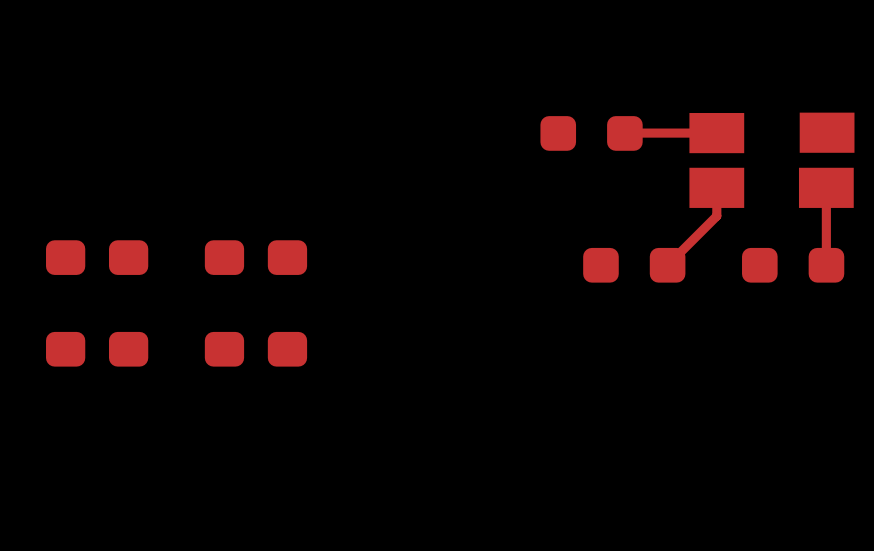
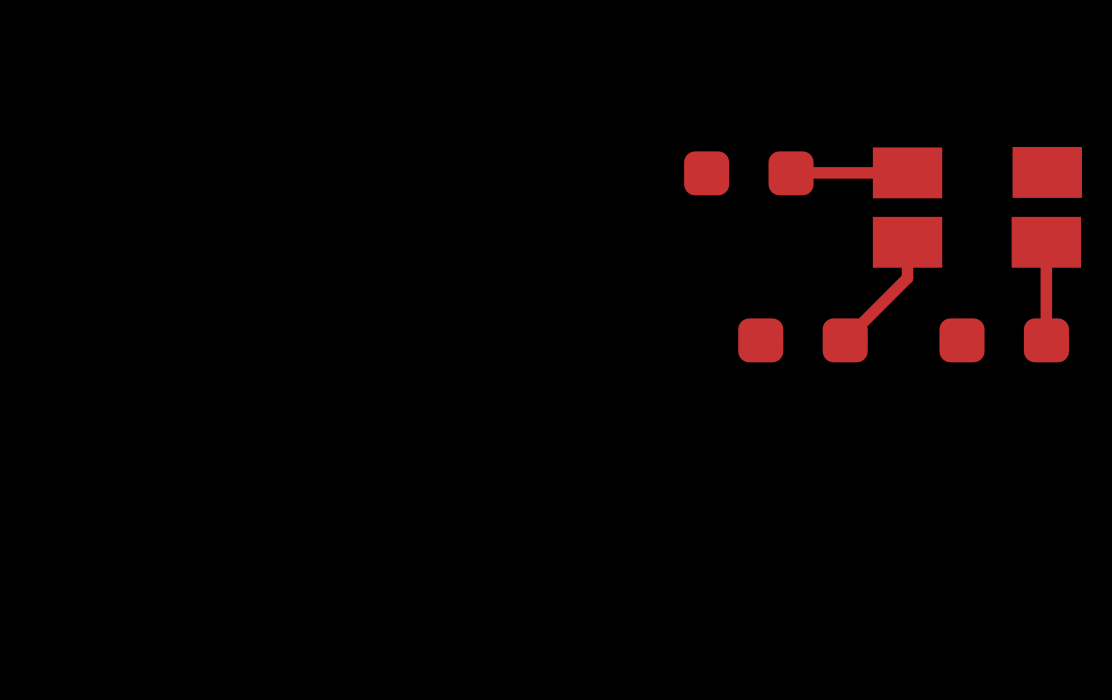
part: (97, 257) -> none
part: (255, 257) -> none
part: (97, 349) -> none
part: (255, 349) -> none

